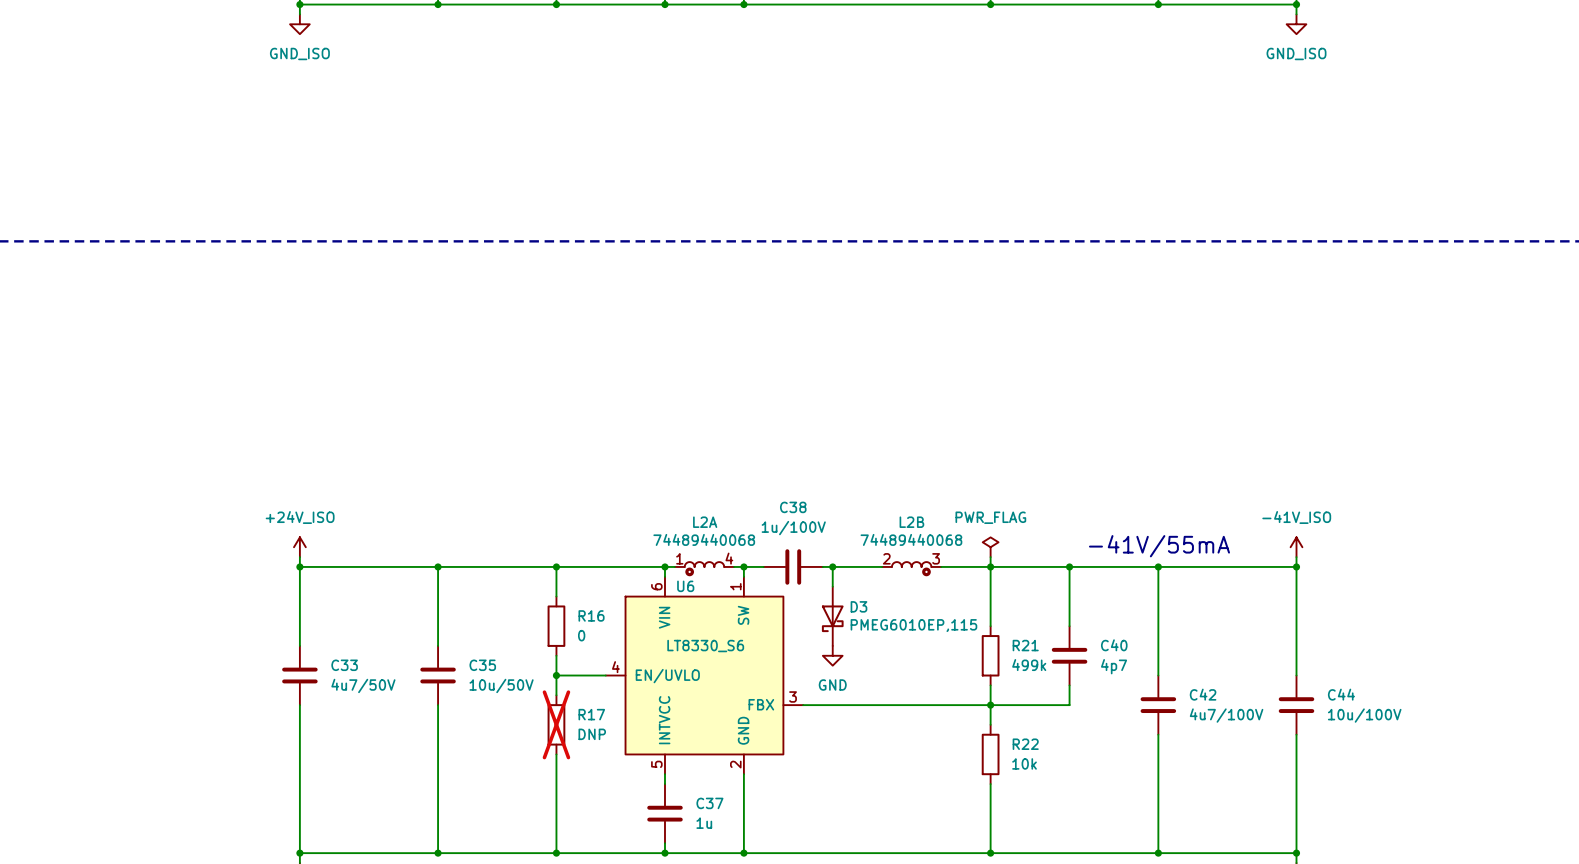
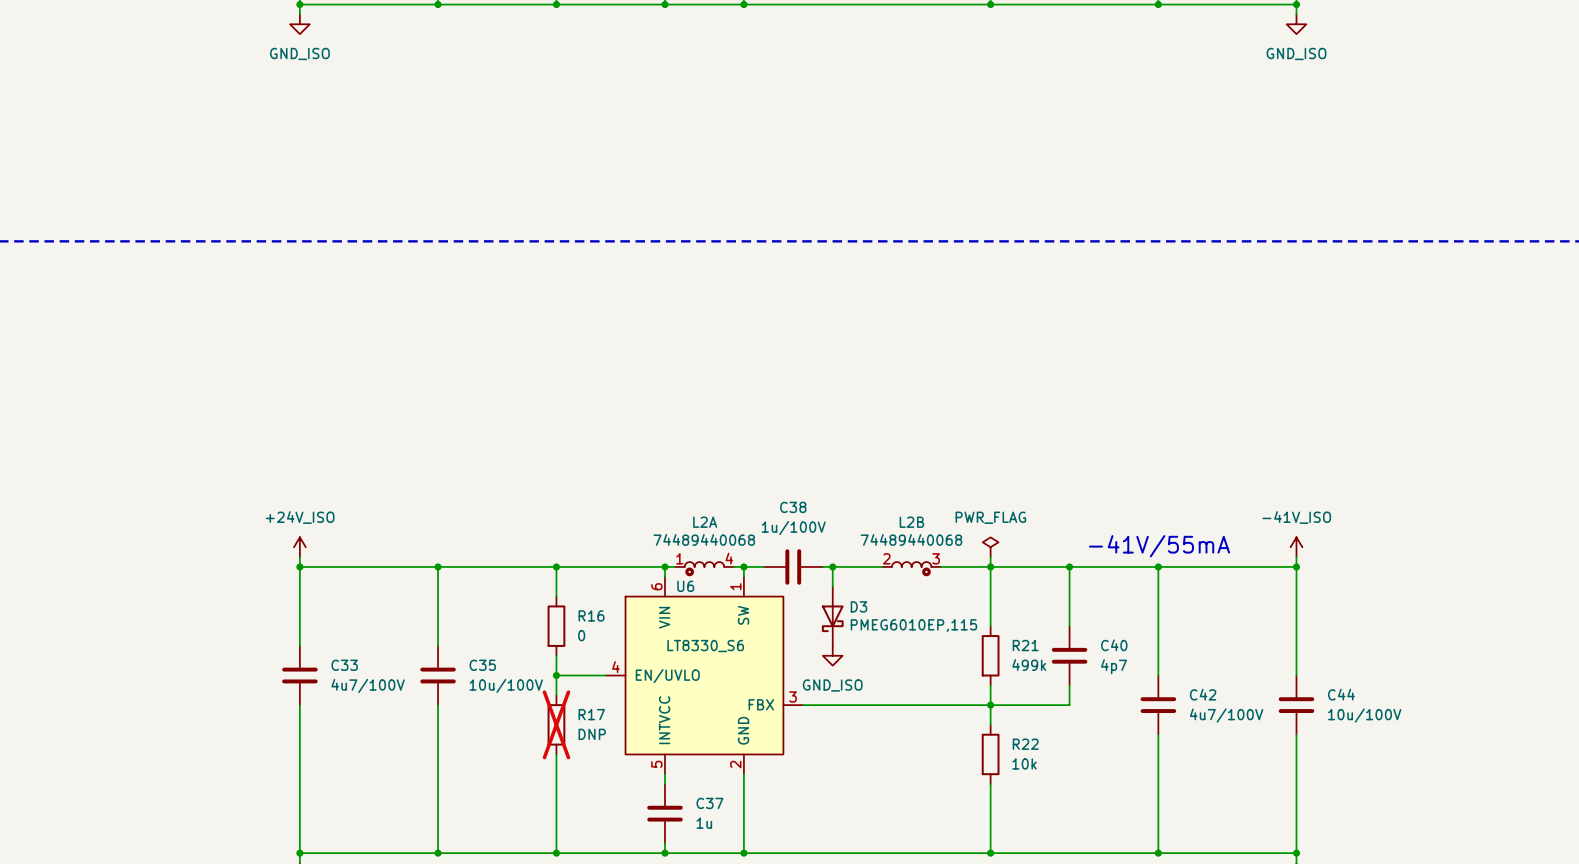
power symbol: GND (832, 655) -> GND_ISO (832, 655)
C33 value: 4u7/50V (363, 685) -> 4u7/100V (368, 685)
C35 value: 10u/50V (501, 685) -> 10u/100V (506, 685)

